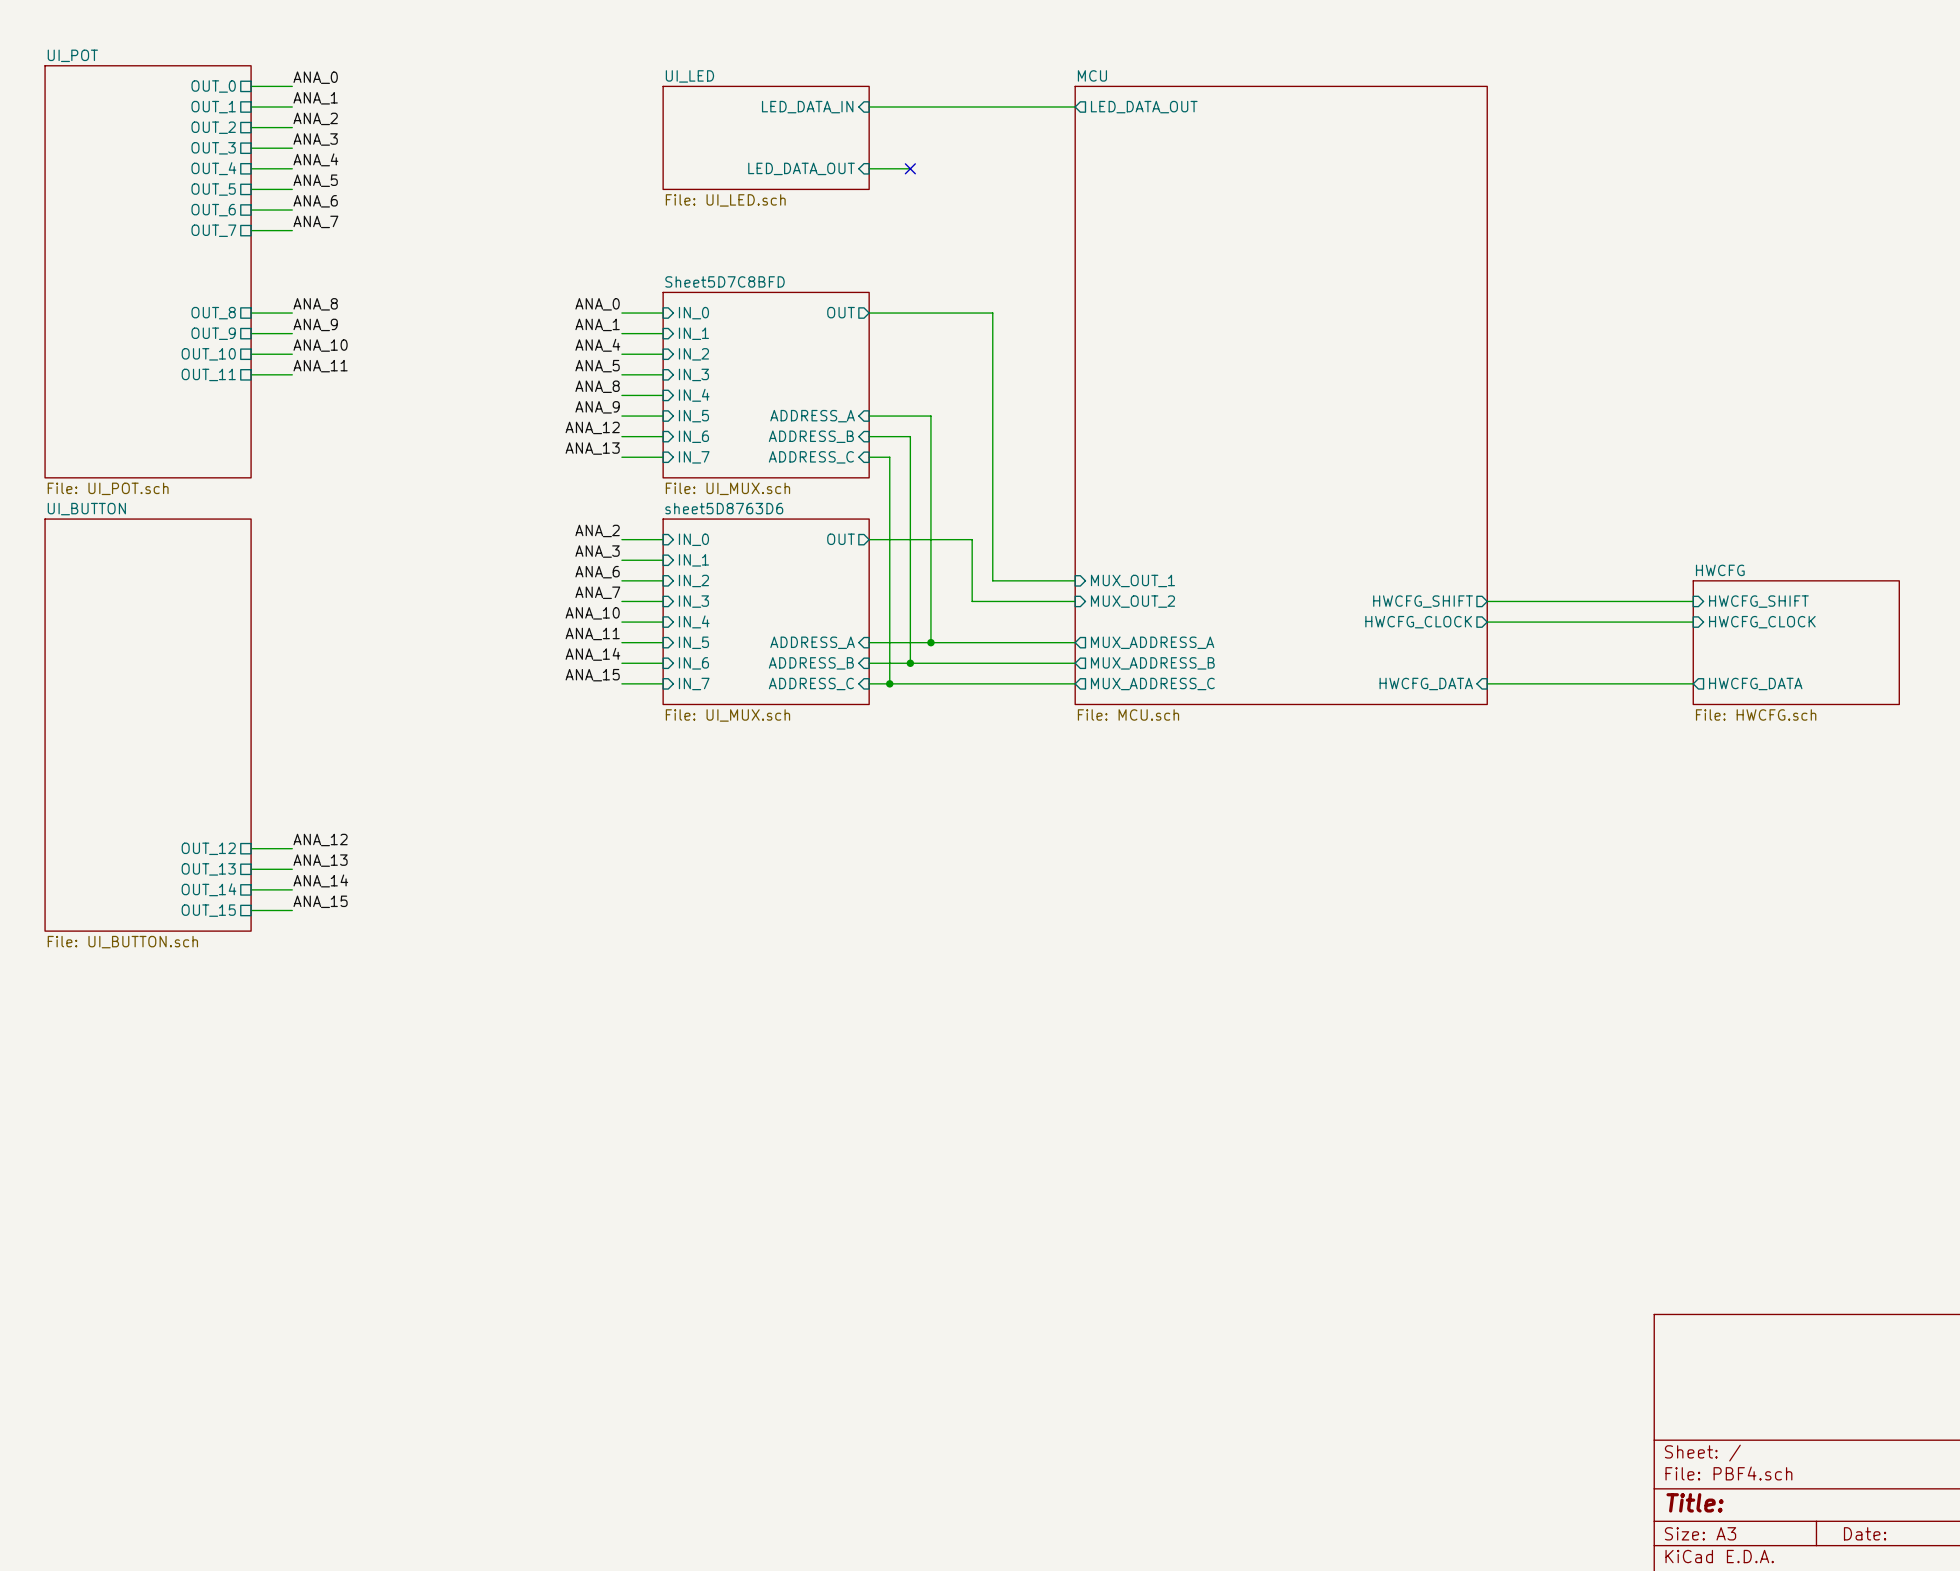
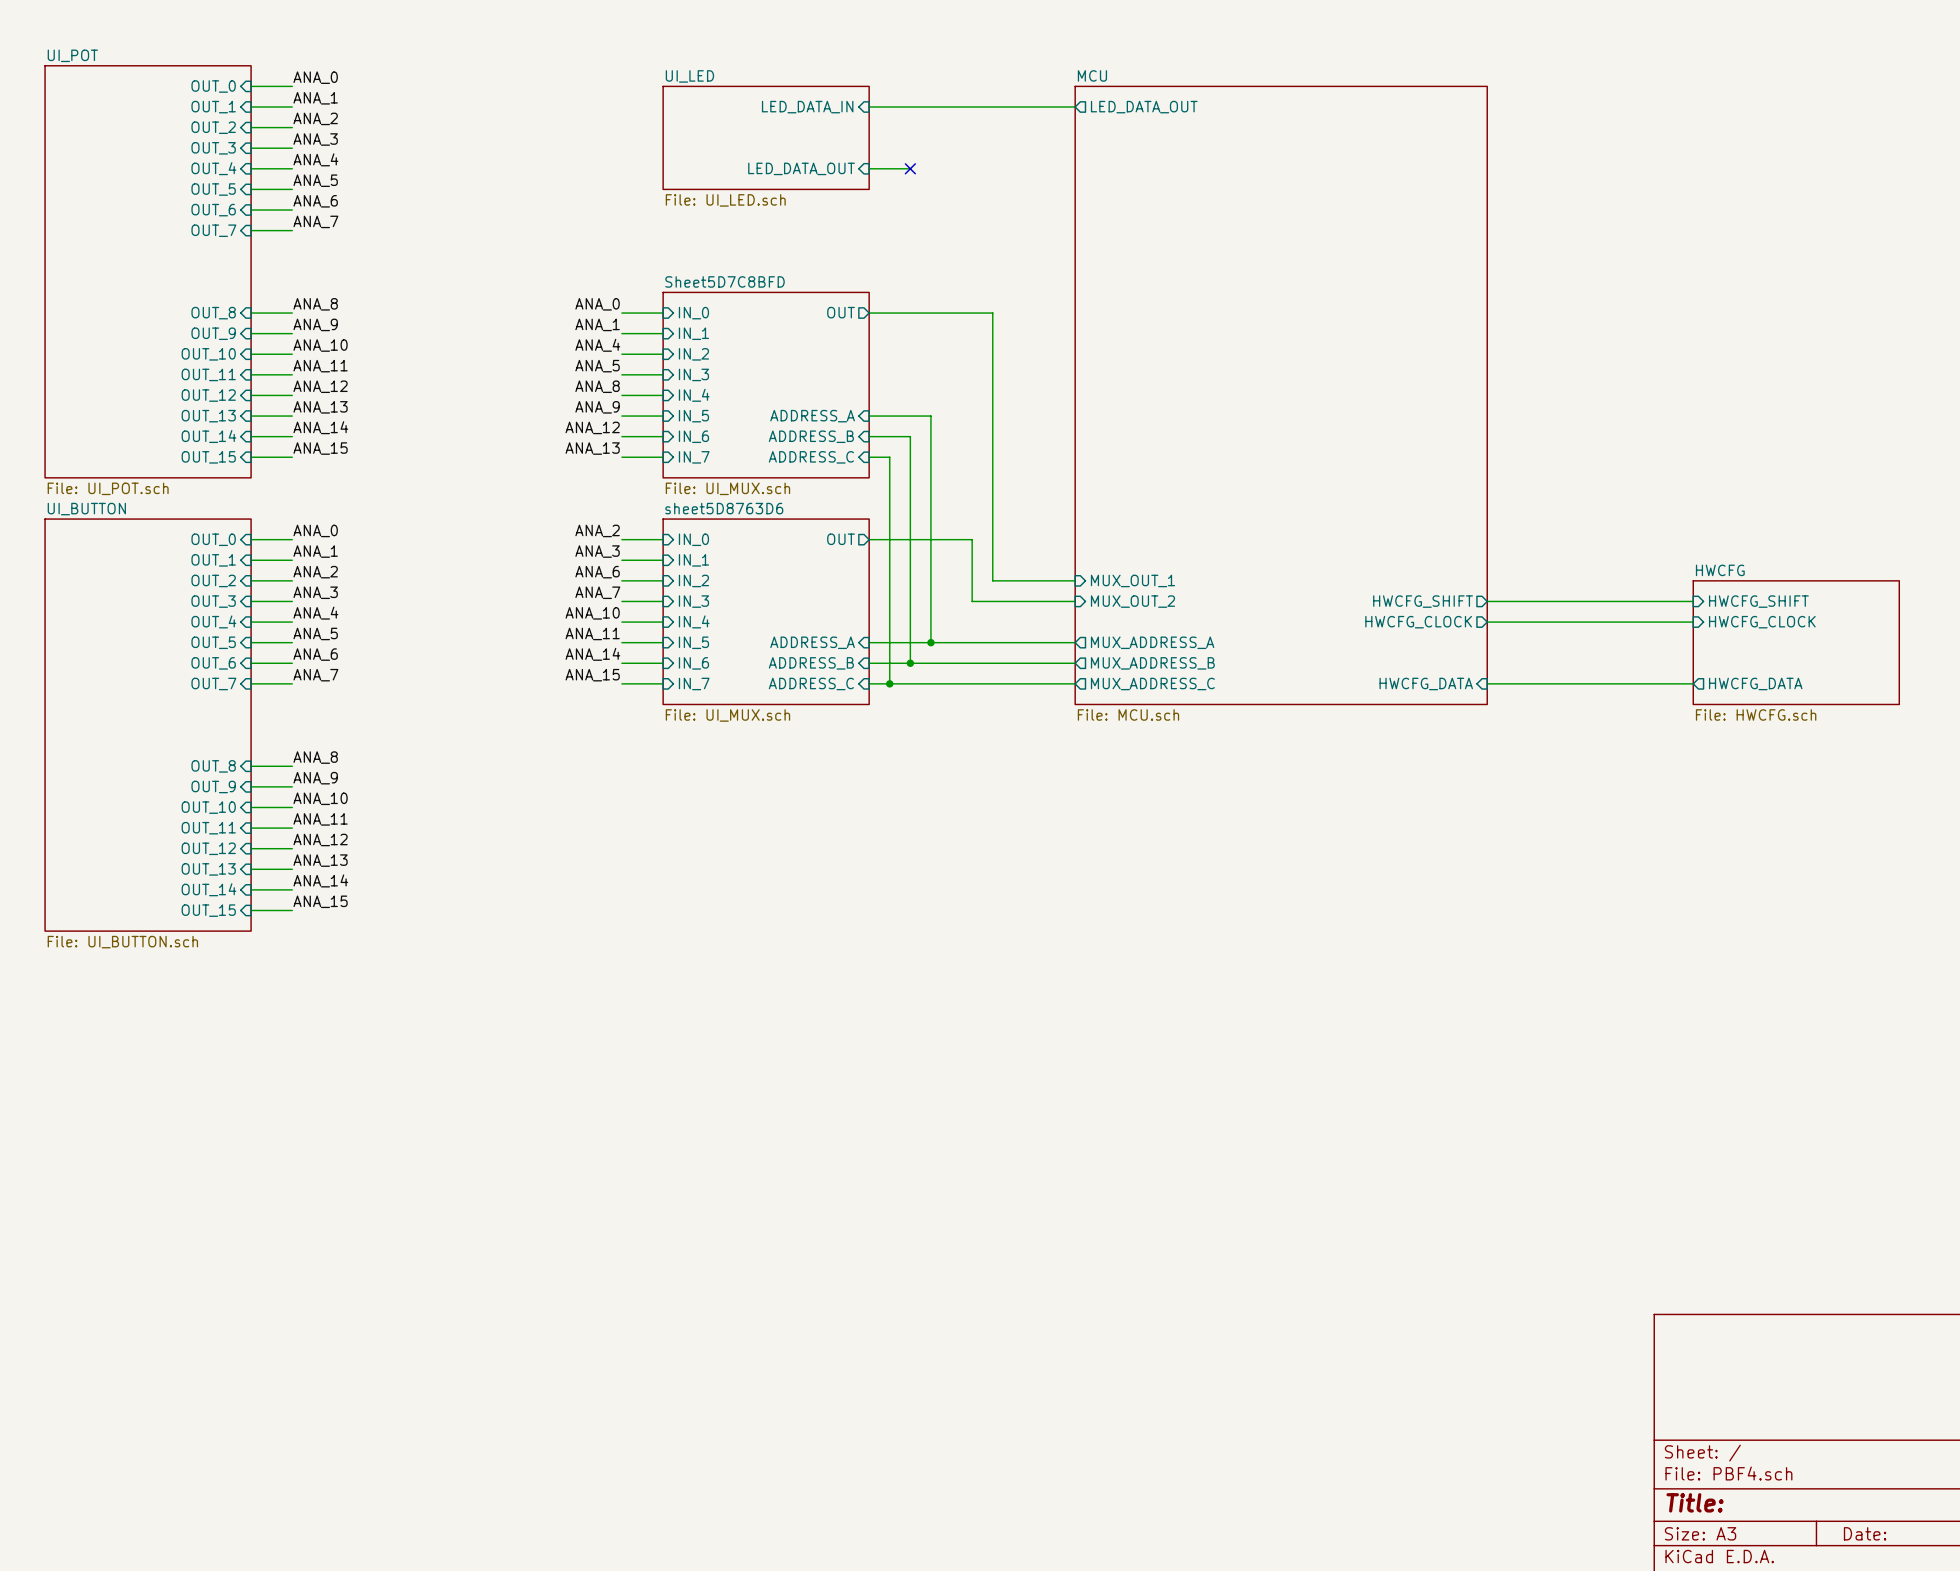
sheet pin shape: passive (213, 86) -> input (213, 86)
sheet pin shape: passive (213, 107) -> input (213, 107)
sheet pin shape: passive (213, 127) -> input (213, 127)
sheet pin shape: passive (213, 148) -> input (213, 148)
sheet pin shape: passive (213, 168) -> input (213, 168)
sheet pin shape: passive (213, 189) -> input (213, 189)
sheet pin shape: passive (213, 210) -> input (213, 210)
sheet pin shape: passive (213, 230) -> input (213, 230)
sheet pin shape: passive (213, 313) -> input (213, 313)
sheet pin shape: passive (213, 333) -> input (213, 333)
sheet pin shape: passive (208, 354) -> input (208, 354)
sheet pin shape: passive (208, 374) -> input (208, 374)
label: none -> ANA_12 (320, 386)
sheet pin: none -> OUT_12 (208, 395)
wire: none -> (251, 395) (292, 395)
label: none -> ANA_13 (320, 407)
sheet pin: none -> OUT_13 (208, 416)
wire: none -> (251, 416) (292, 416)
label: none -> ANA_14 (320, 427)
sheet pin: none -> OUT_14 (208, 436)
wire: none -> (251, 436) (292, 436)
label: none -> ANA_15 (320, 448)
sheet pin: none -> OUT_15 (208, 457)
wire: none -> (251, 457) (292, 457)
label: none -> ANA_0 (315, 530)
sheet pin: none -> OUT_0 (213, 539)
wire: none -> (251, 539) (292, 539)
label: none -> ANA_1 (315, 551)
sheet pin: none -> OUT_1 (213, 560)
wire: none -> (251, 560) (292, 560)
label: none -> ANA_2 (315, 572)
sheet pin: none -> OUT_2 (213, 580)
wire: none -> (251, 580) (292, 580)
label: none -> ANA_3 (315, 592)
sheet pin: none -> OUT_3 (213, 601)
wire: none -> (251, 601) (292, 601)
label: none -> ANA_4 (315, 613)
sheet pin: none -> OUT_4 (213, 621)
wire: none -> (251, 622) (292, 622)
label: none -> ANA_5 (315, 633)
sheet pin: none -> OUT_5 (213, 642)
wire: none -> (251, 642) (292, 642)
label: none -> ANA_6 (315, 654)
sheet pin: none -> OUT_6 (213, 663)
wire: none -> (251, 663) (292, 663)
label: none -> ANA_7 (315, 675)
sheet pin: none -> OUT_7 (213, 683)
wire: none -> (251, 683) (292, 683)
label: none -> ANA_8 (315, 757)
sheet pin: none -> OUT_8 (213, 766)
wire: none -> (251, 766) (292, 766)
label: none -> ANA_9 (315, 778)
sheet pin: none -> OUT_9 (213, 786)
wire: none -> (251, 786) (292, 786)
label: none -> ANA_10 (320, 798)
sheet pin: none -> OUT_10 (208, 807)
wire: none -> (251, 807) (292, 807)
label: none -> ANA_11 (320, 819)
sheet pin: none -> OUT_11 (208, 828)
wire: none -> (251, 828) (292, 828)
sheet pin shape: passive (208, 848) -> input (208, 848)
sheet pin shape: passive (208, 869) -> input (208, 869)
sheet pin shape: passive (208, 889) -> input (208, 889)
sheet pin shape: passive (208, 910) -> input (208, 910)

